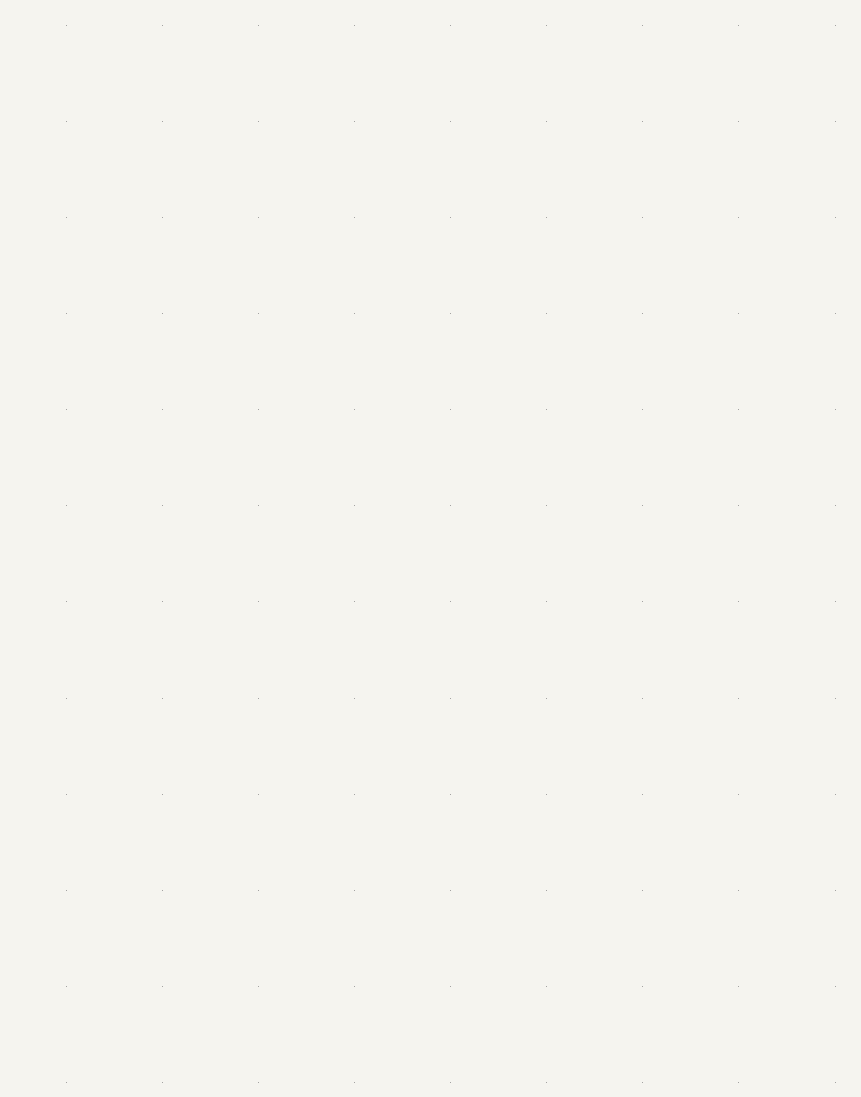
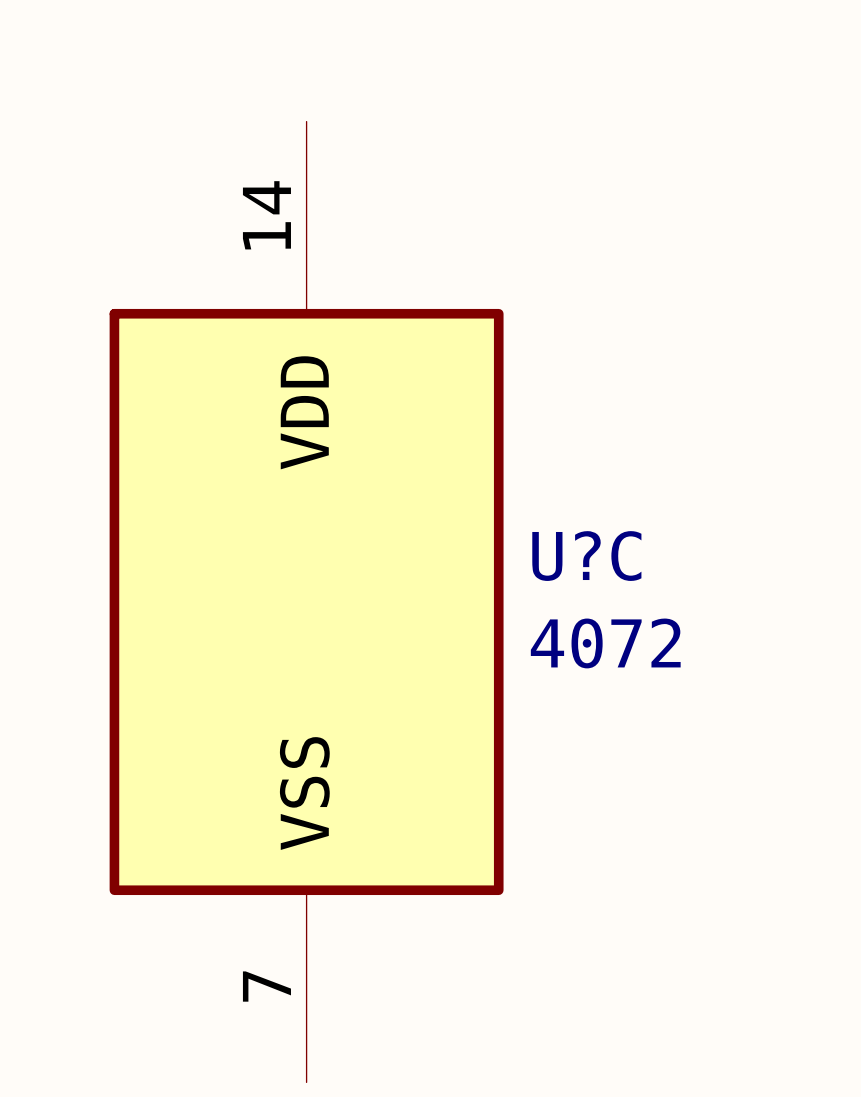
U?C: none -> 4072 (306, 601)

